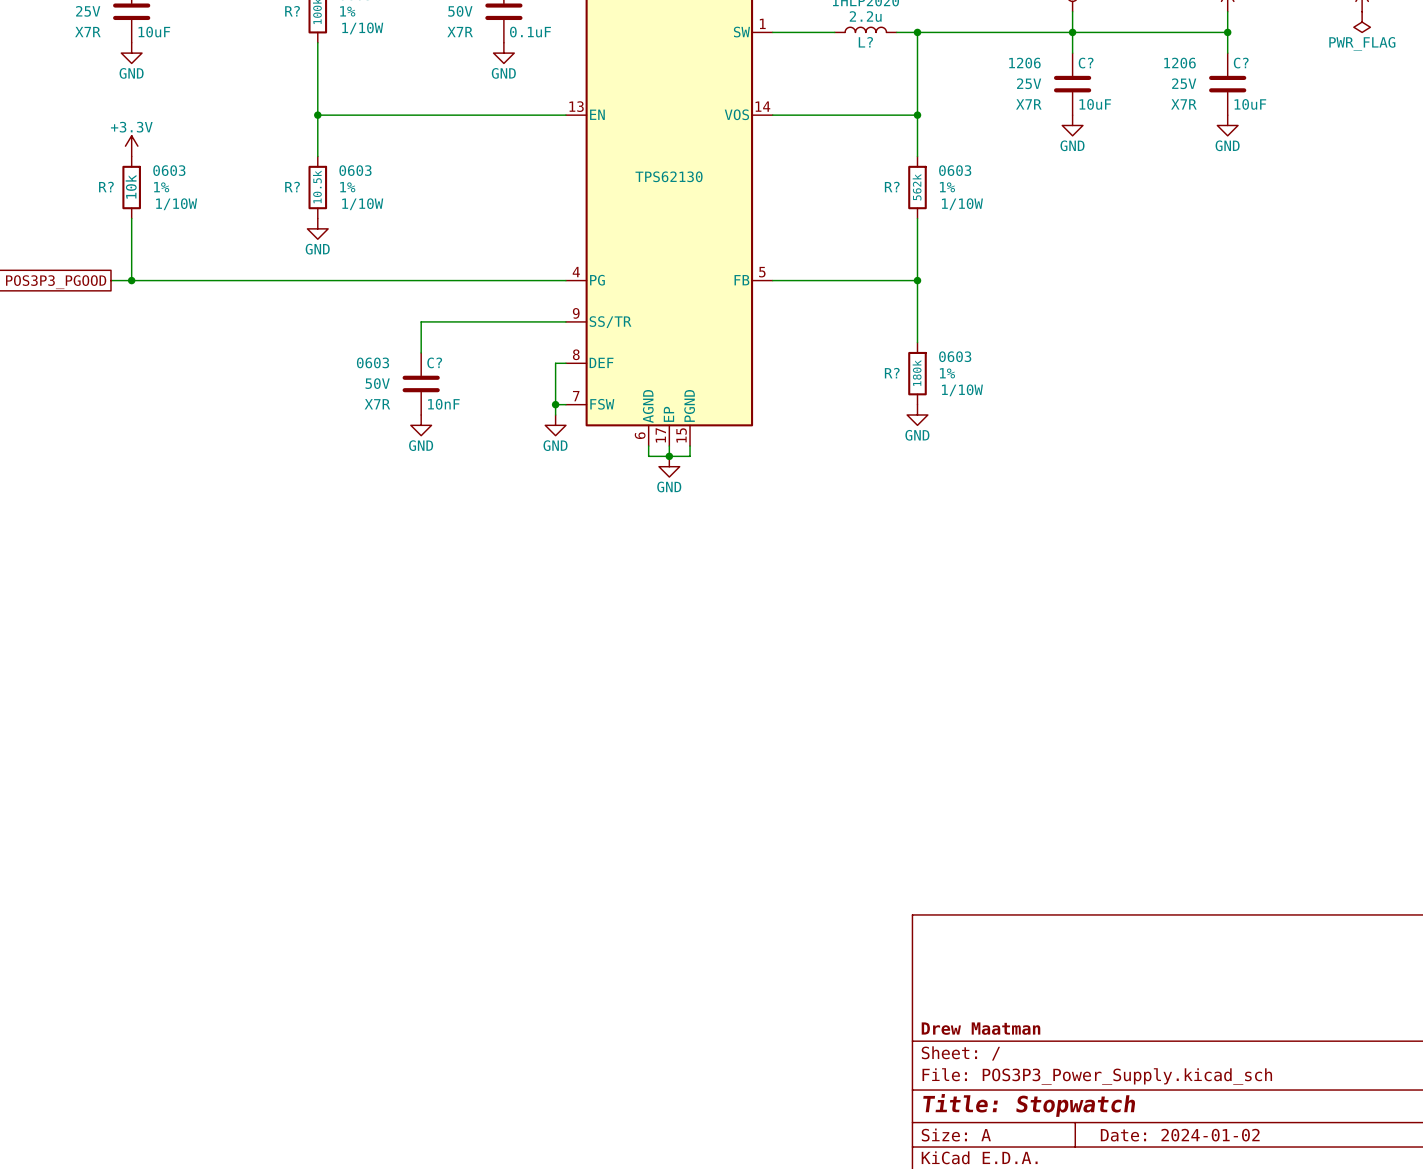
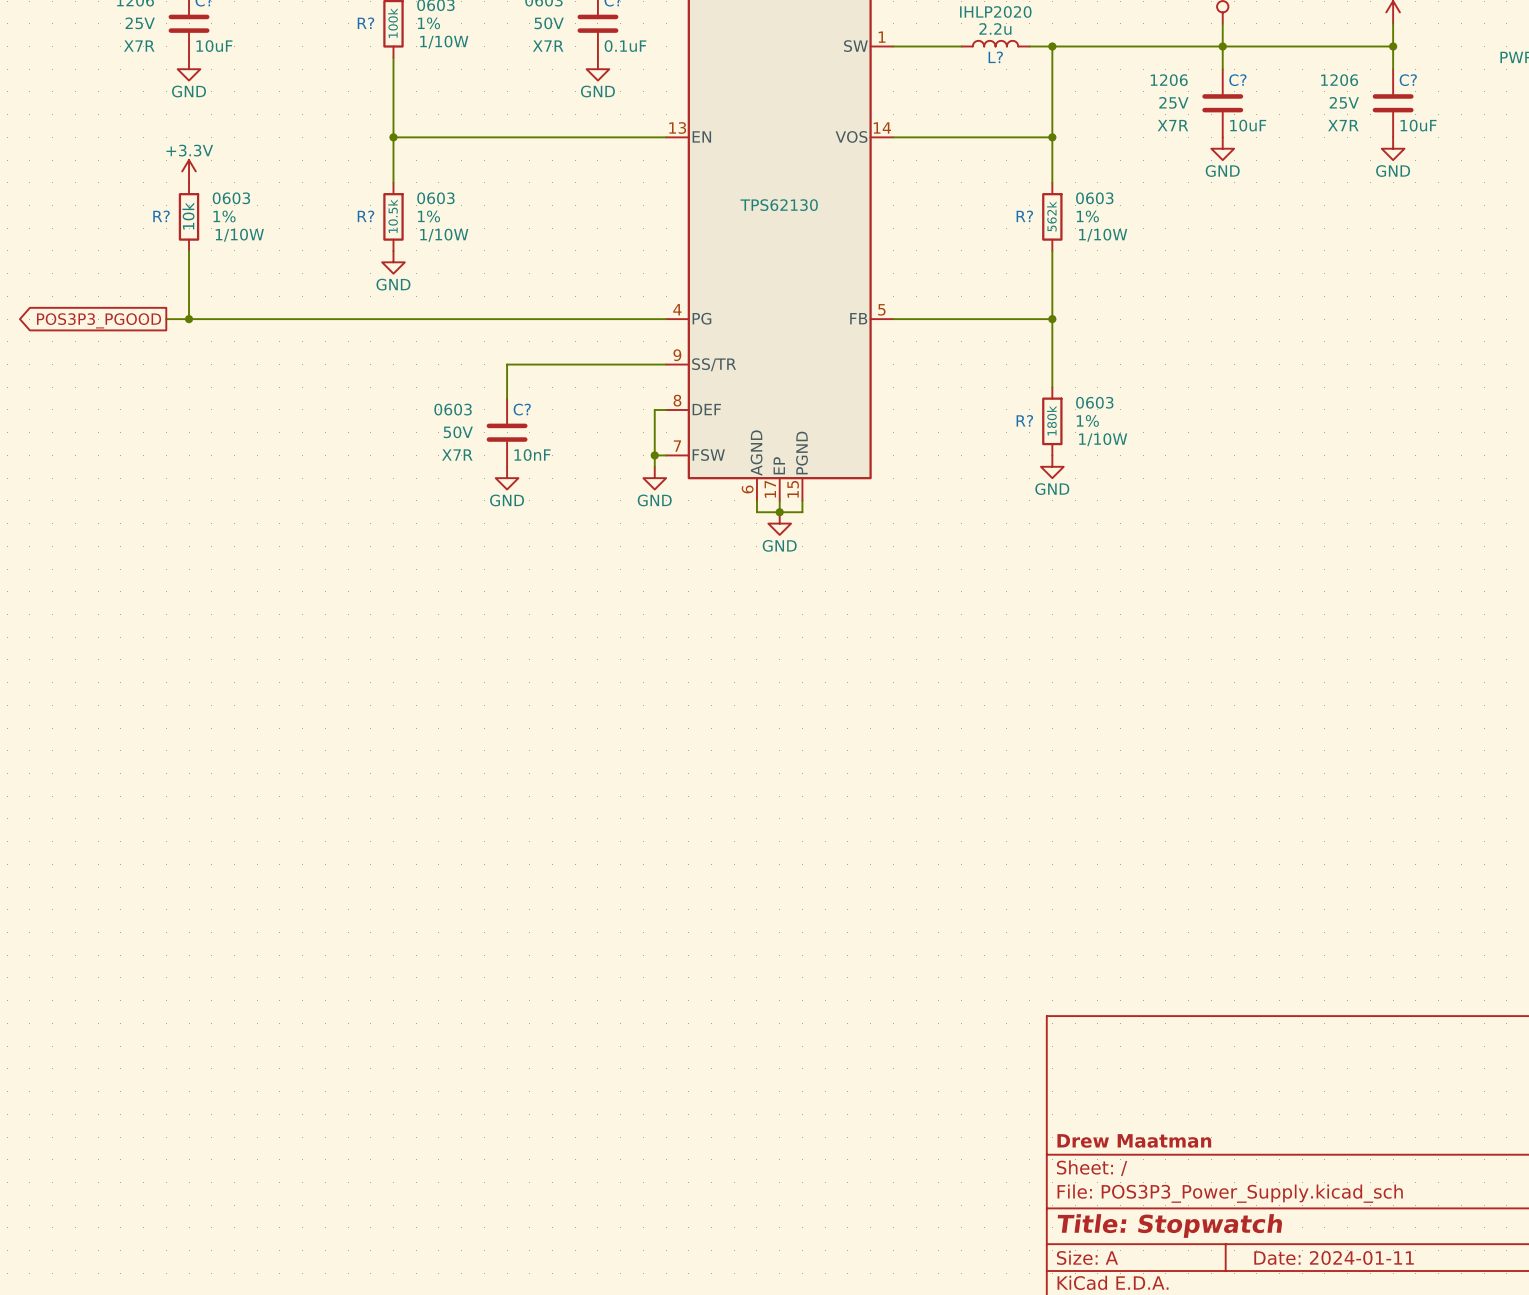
title block: Date: 2024-01-02 (1180, 1135) -> Date: 2024-01-11 (1334, 1257)

